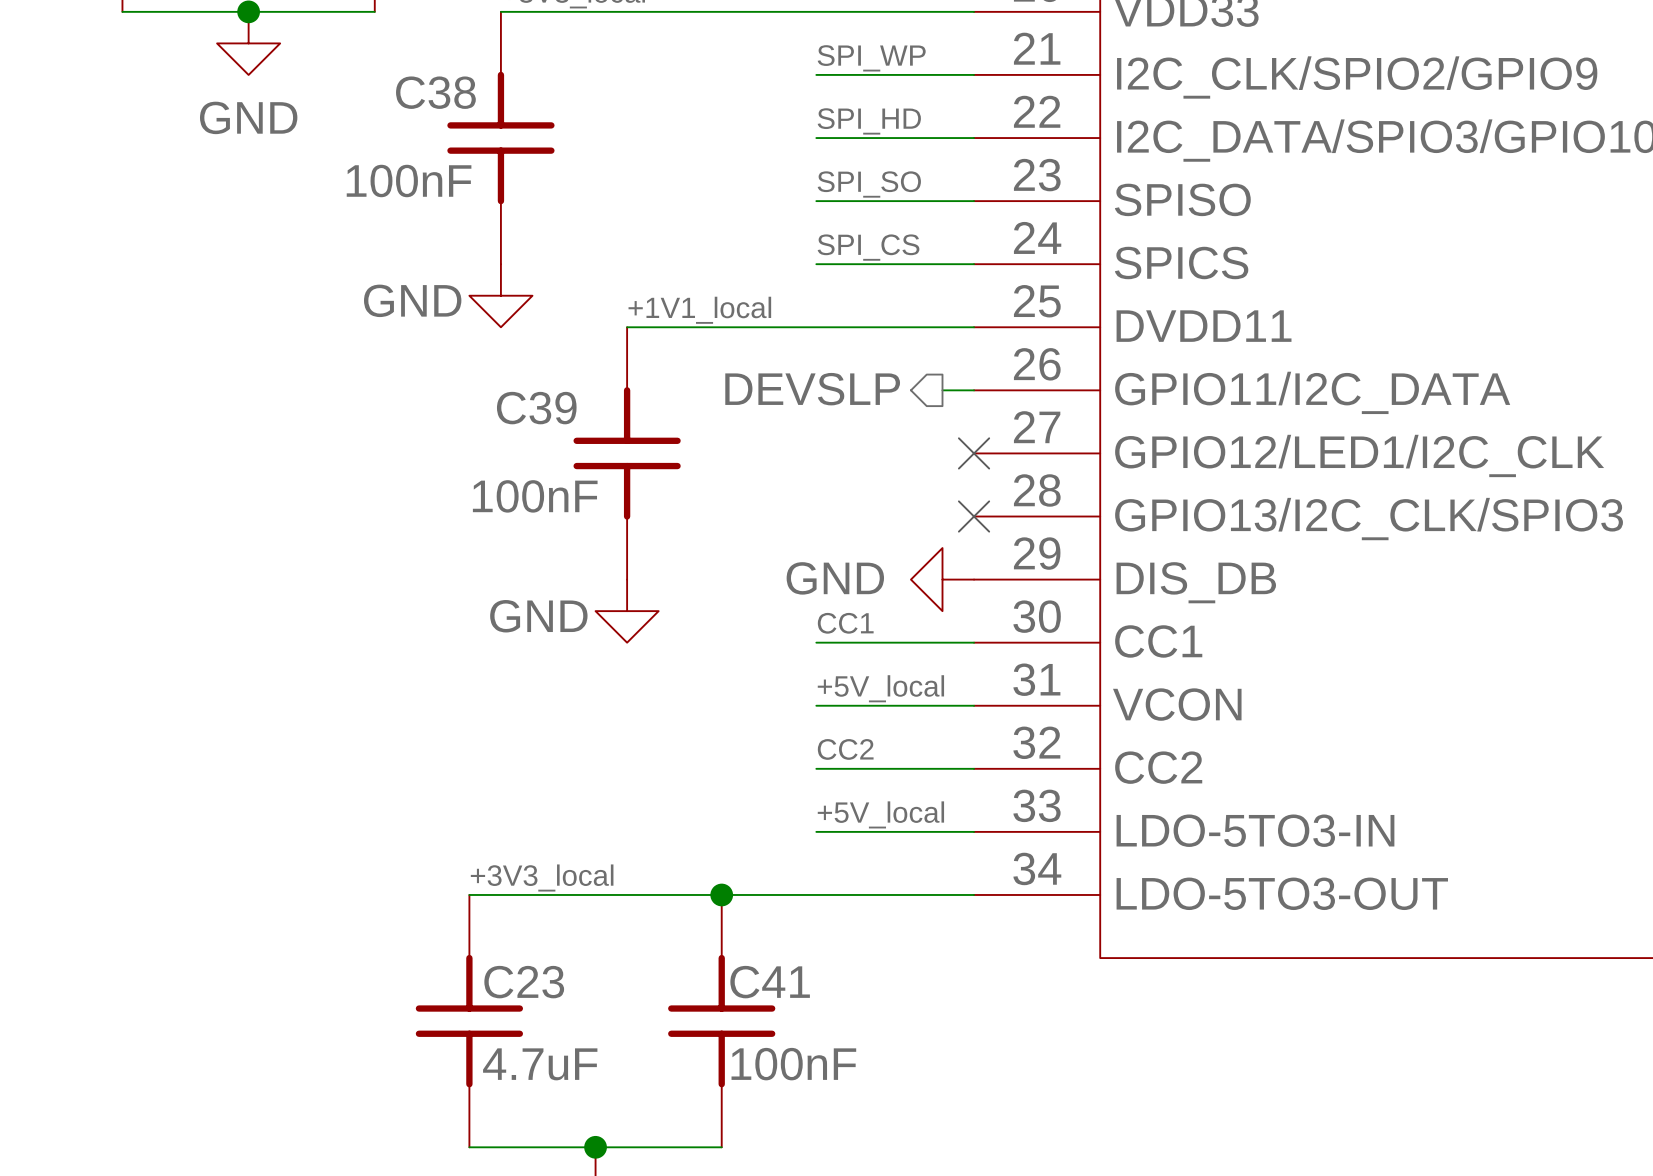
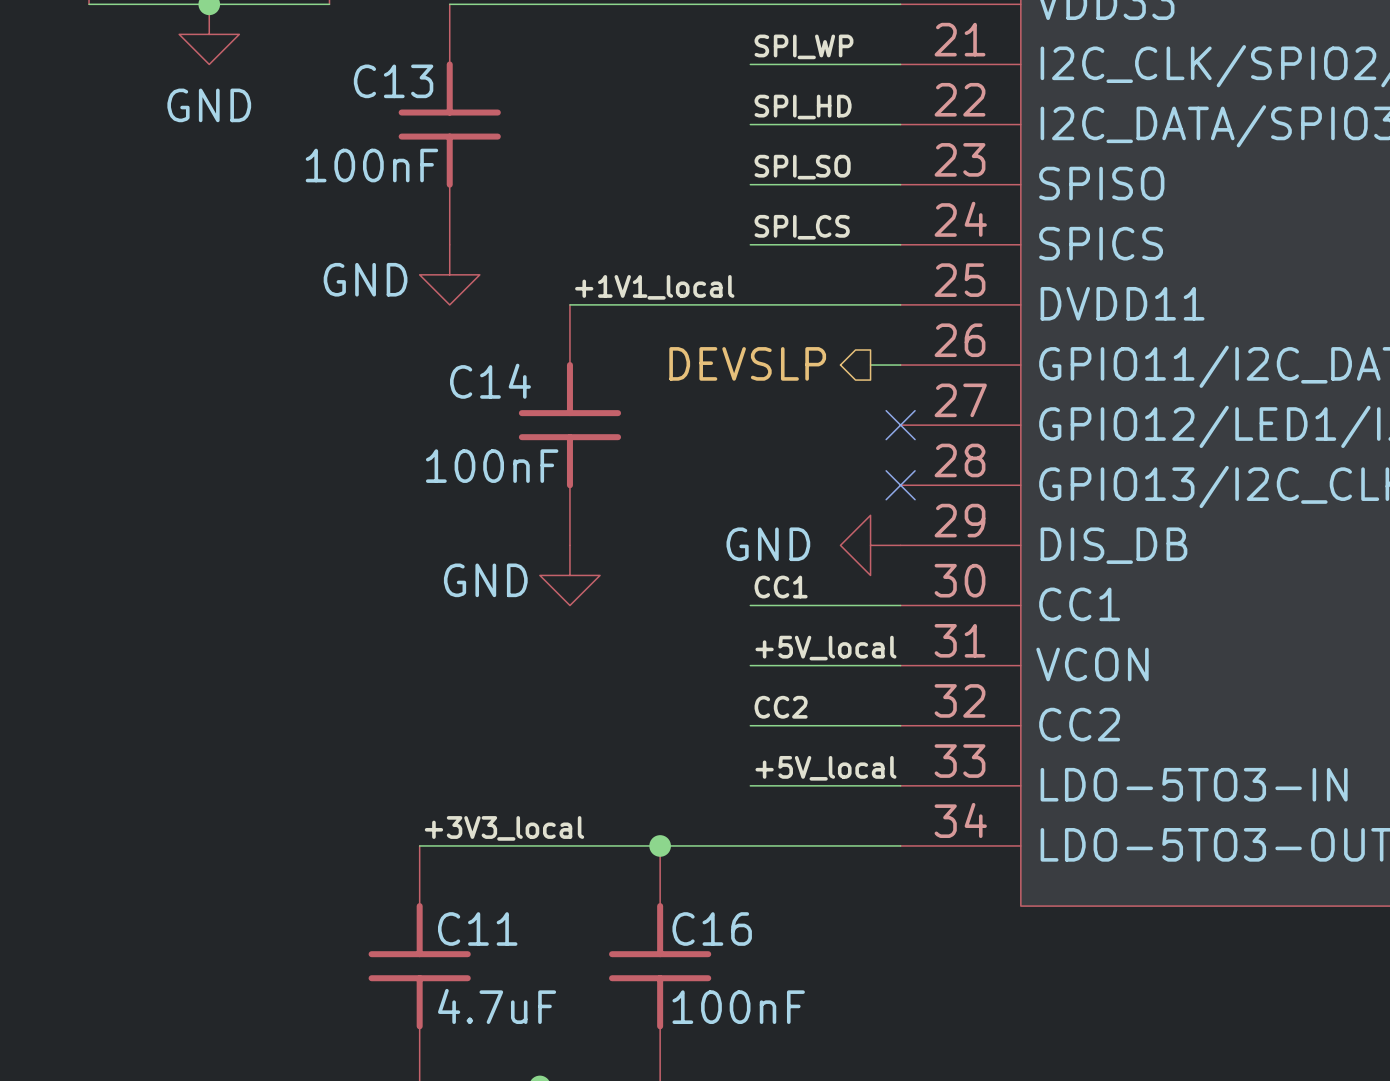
C38 name: C38 (435, 92) -> C13 (393, 81)
C39 name: C39 (536, 408) -> C14 (490, 381)
C23 name: C23 (524, 982) -> C11 (477, 929)
C41 name: C41 (770, 982) -> C16 (712, 929)

